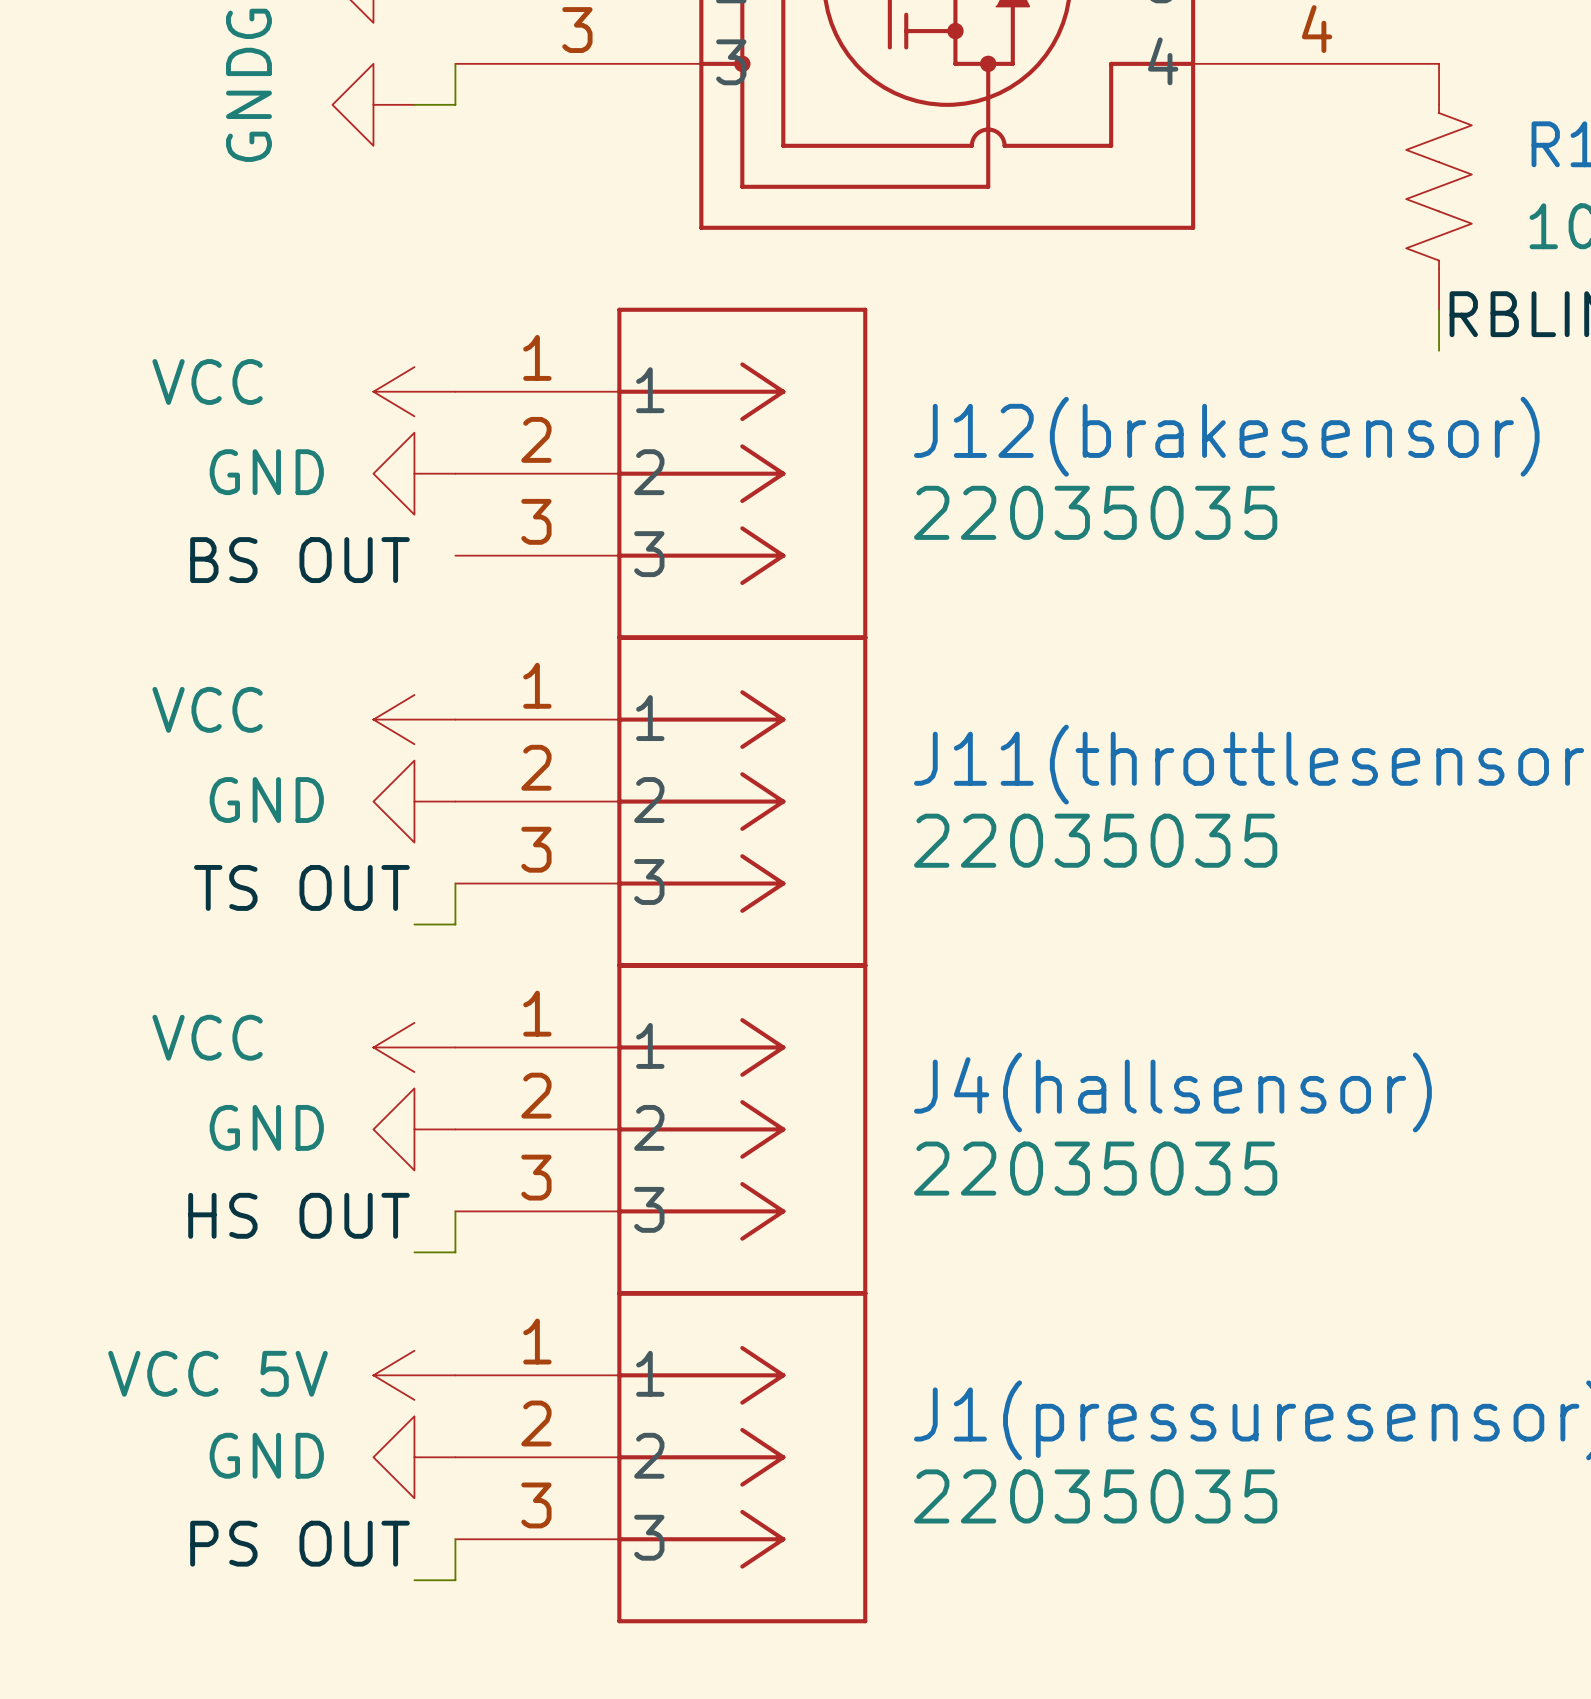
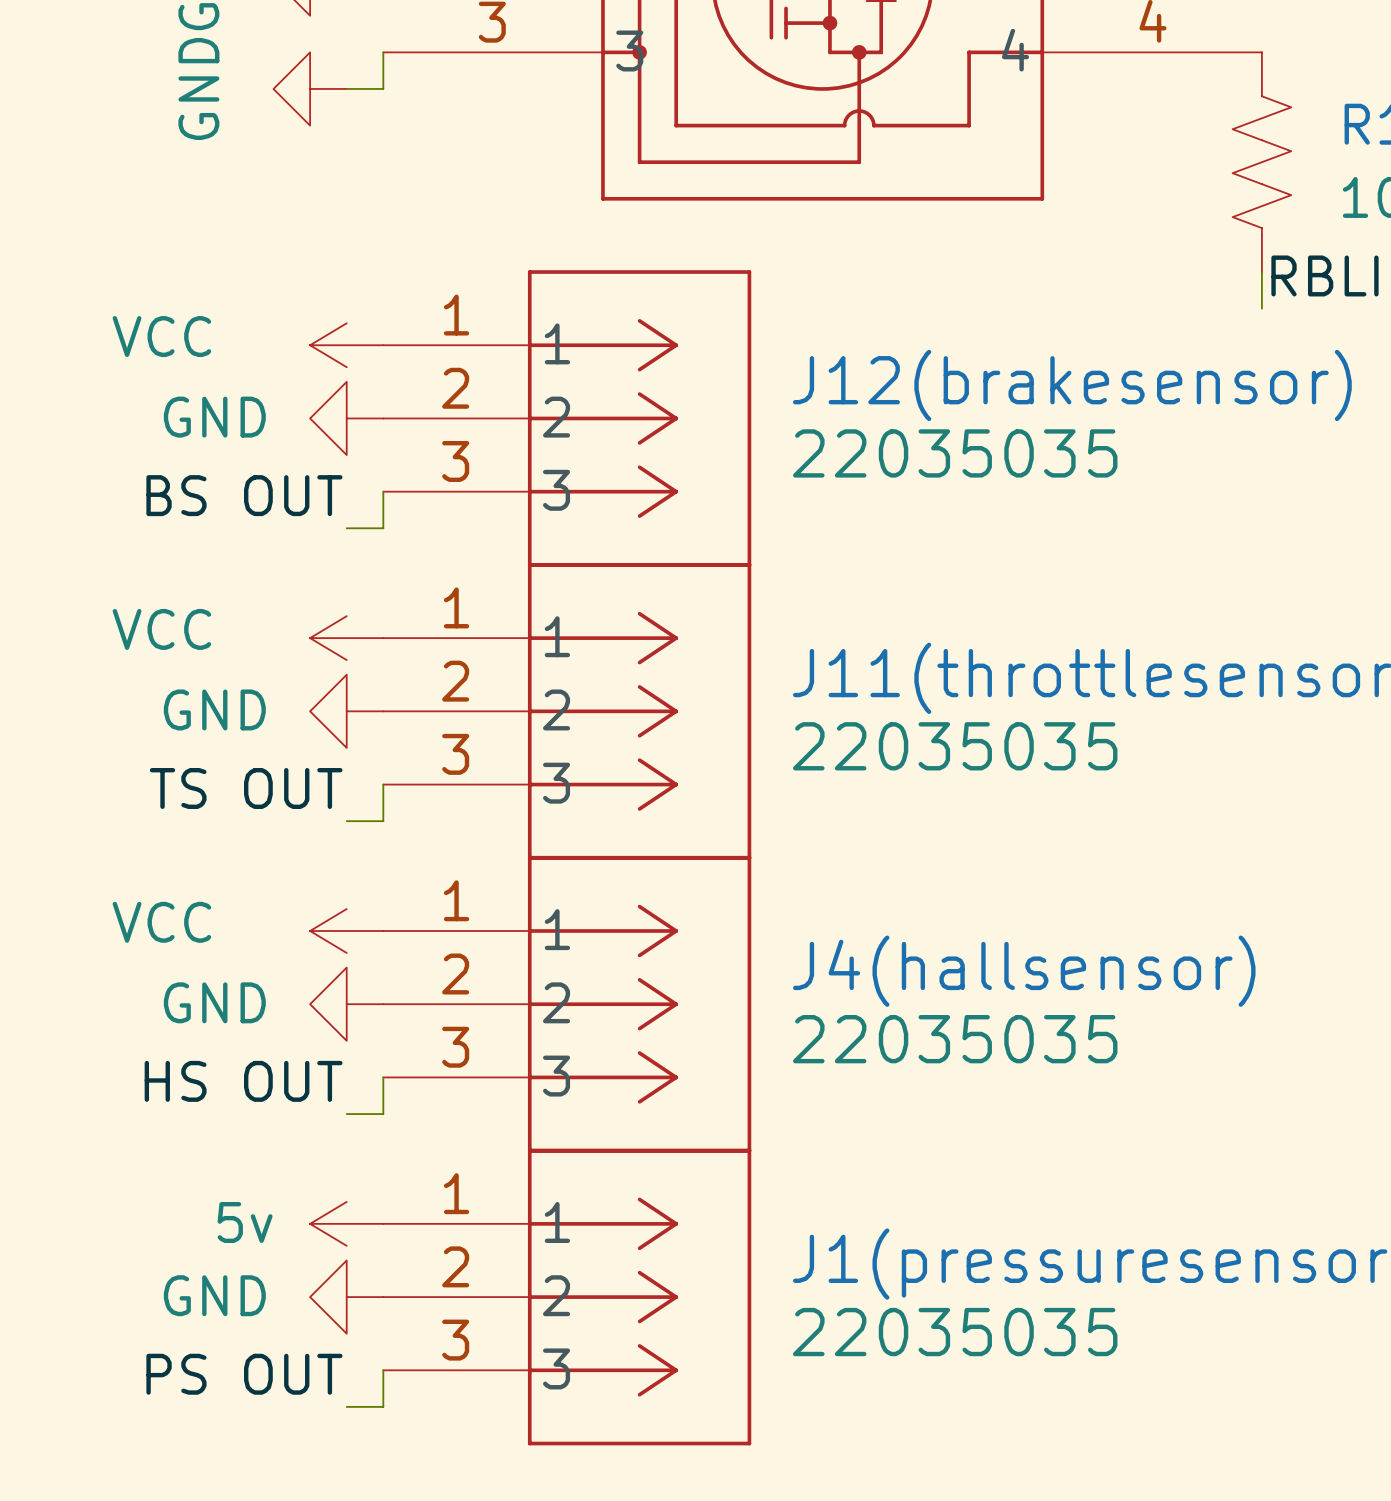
wire: none -> (383, 491) (383, 528) (346, 528)
power symbol: VCC 5V (414, 1375) -> 5v (346, 1223)

